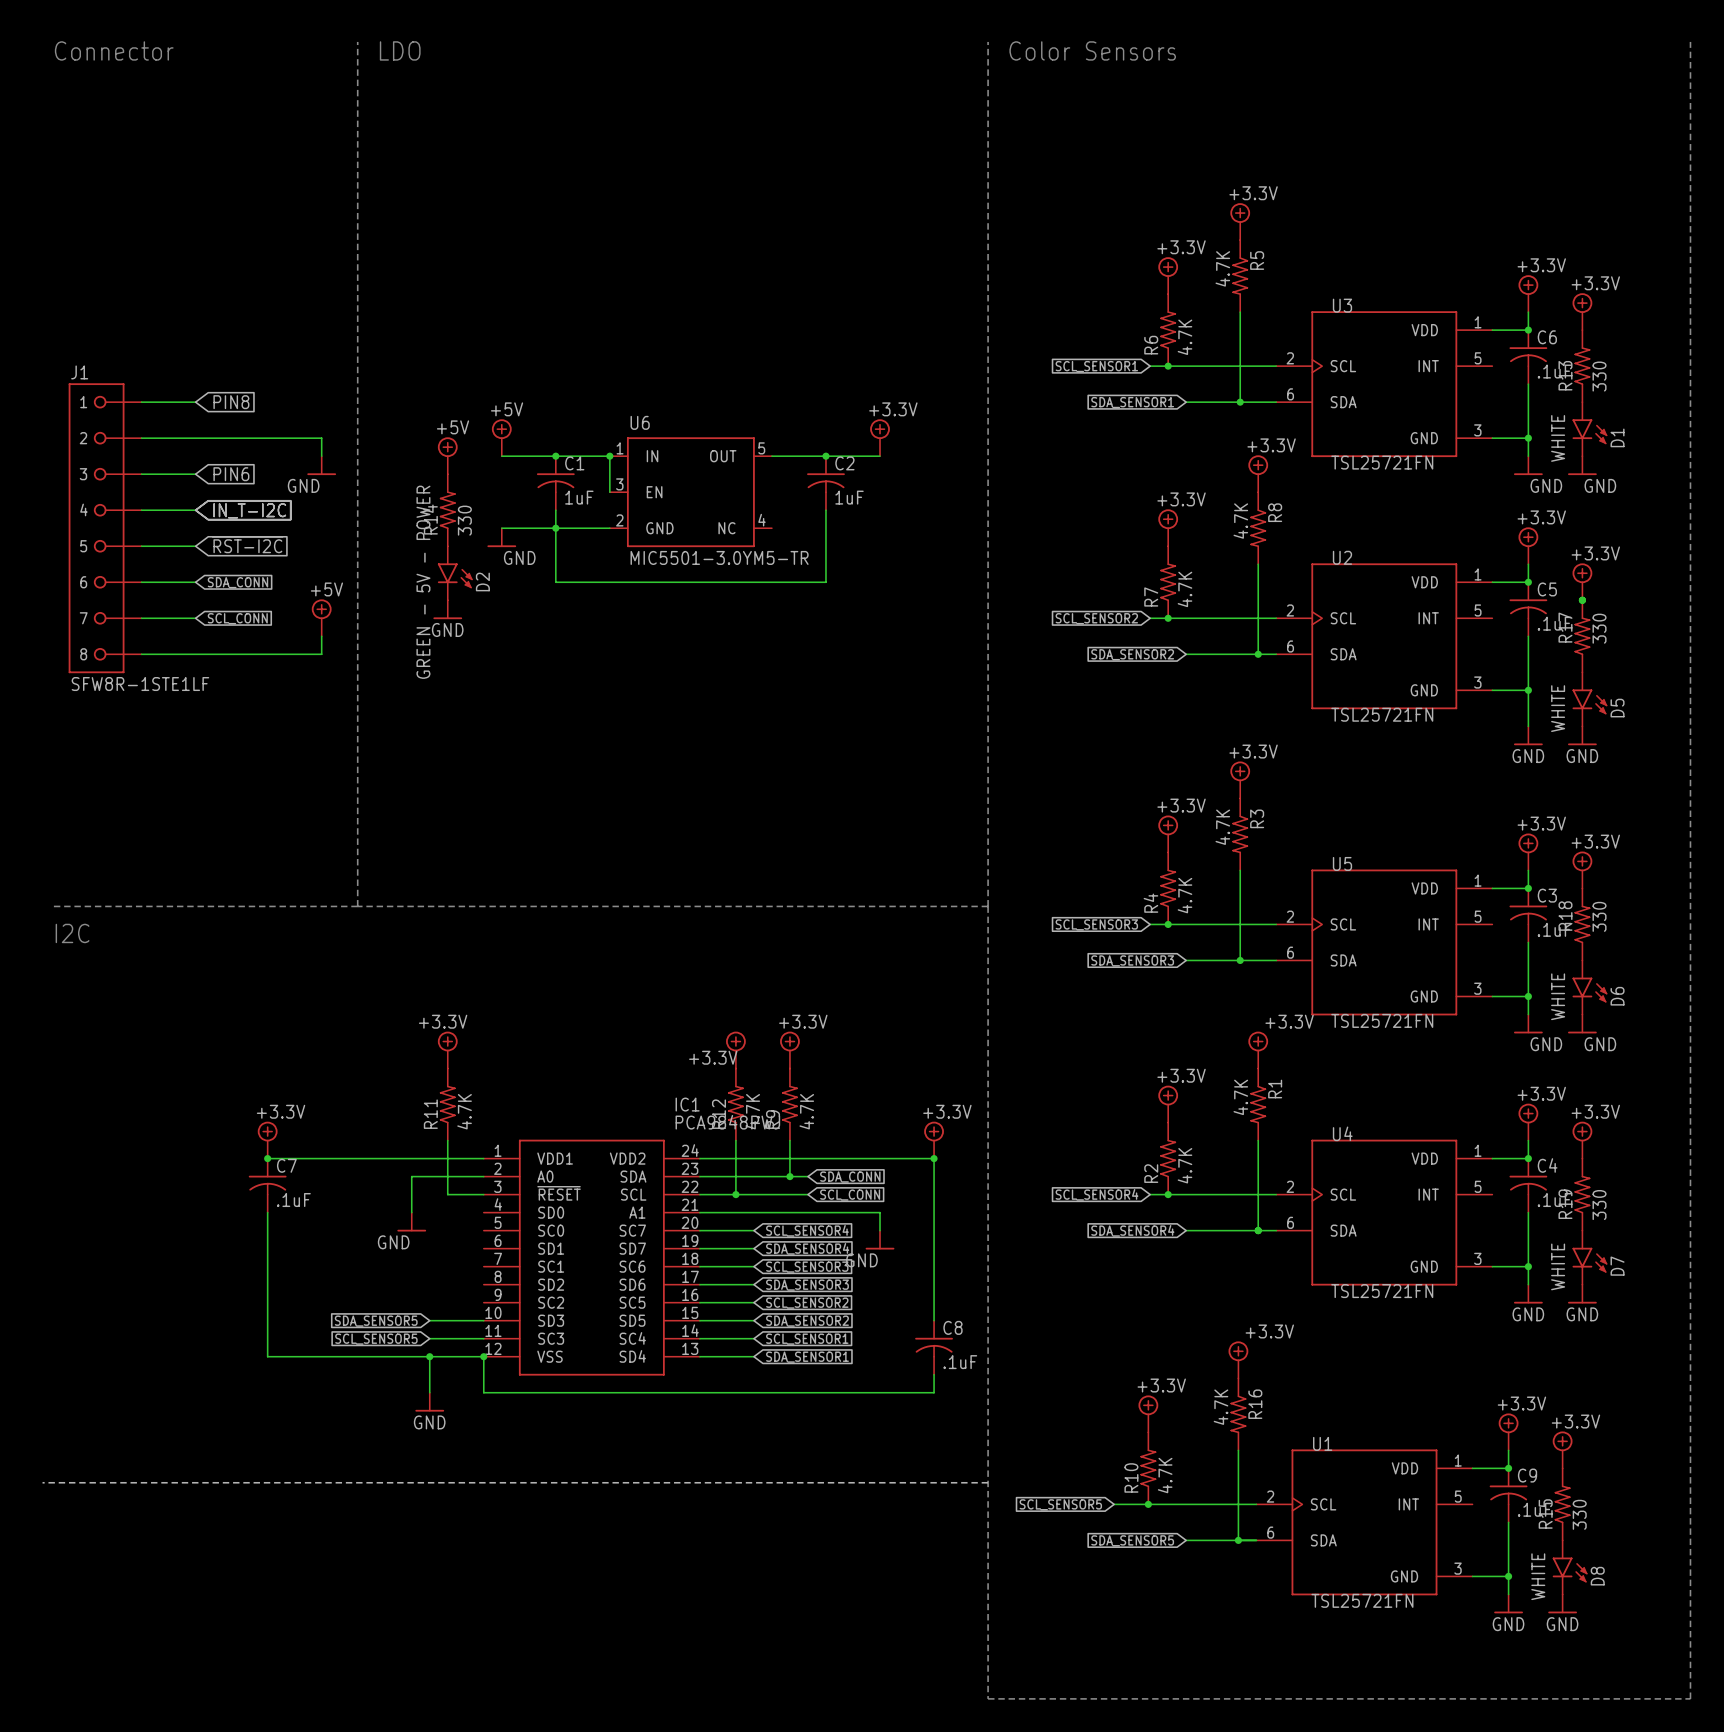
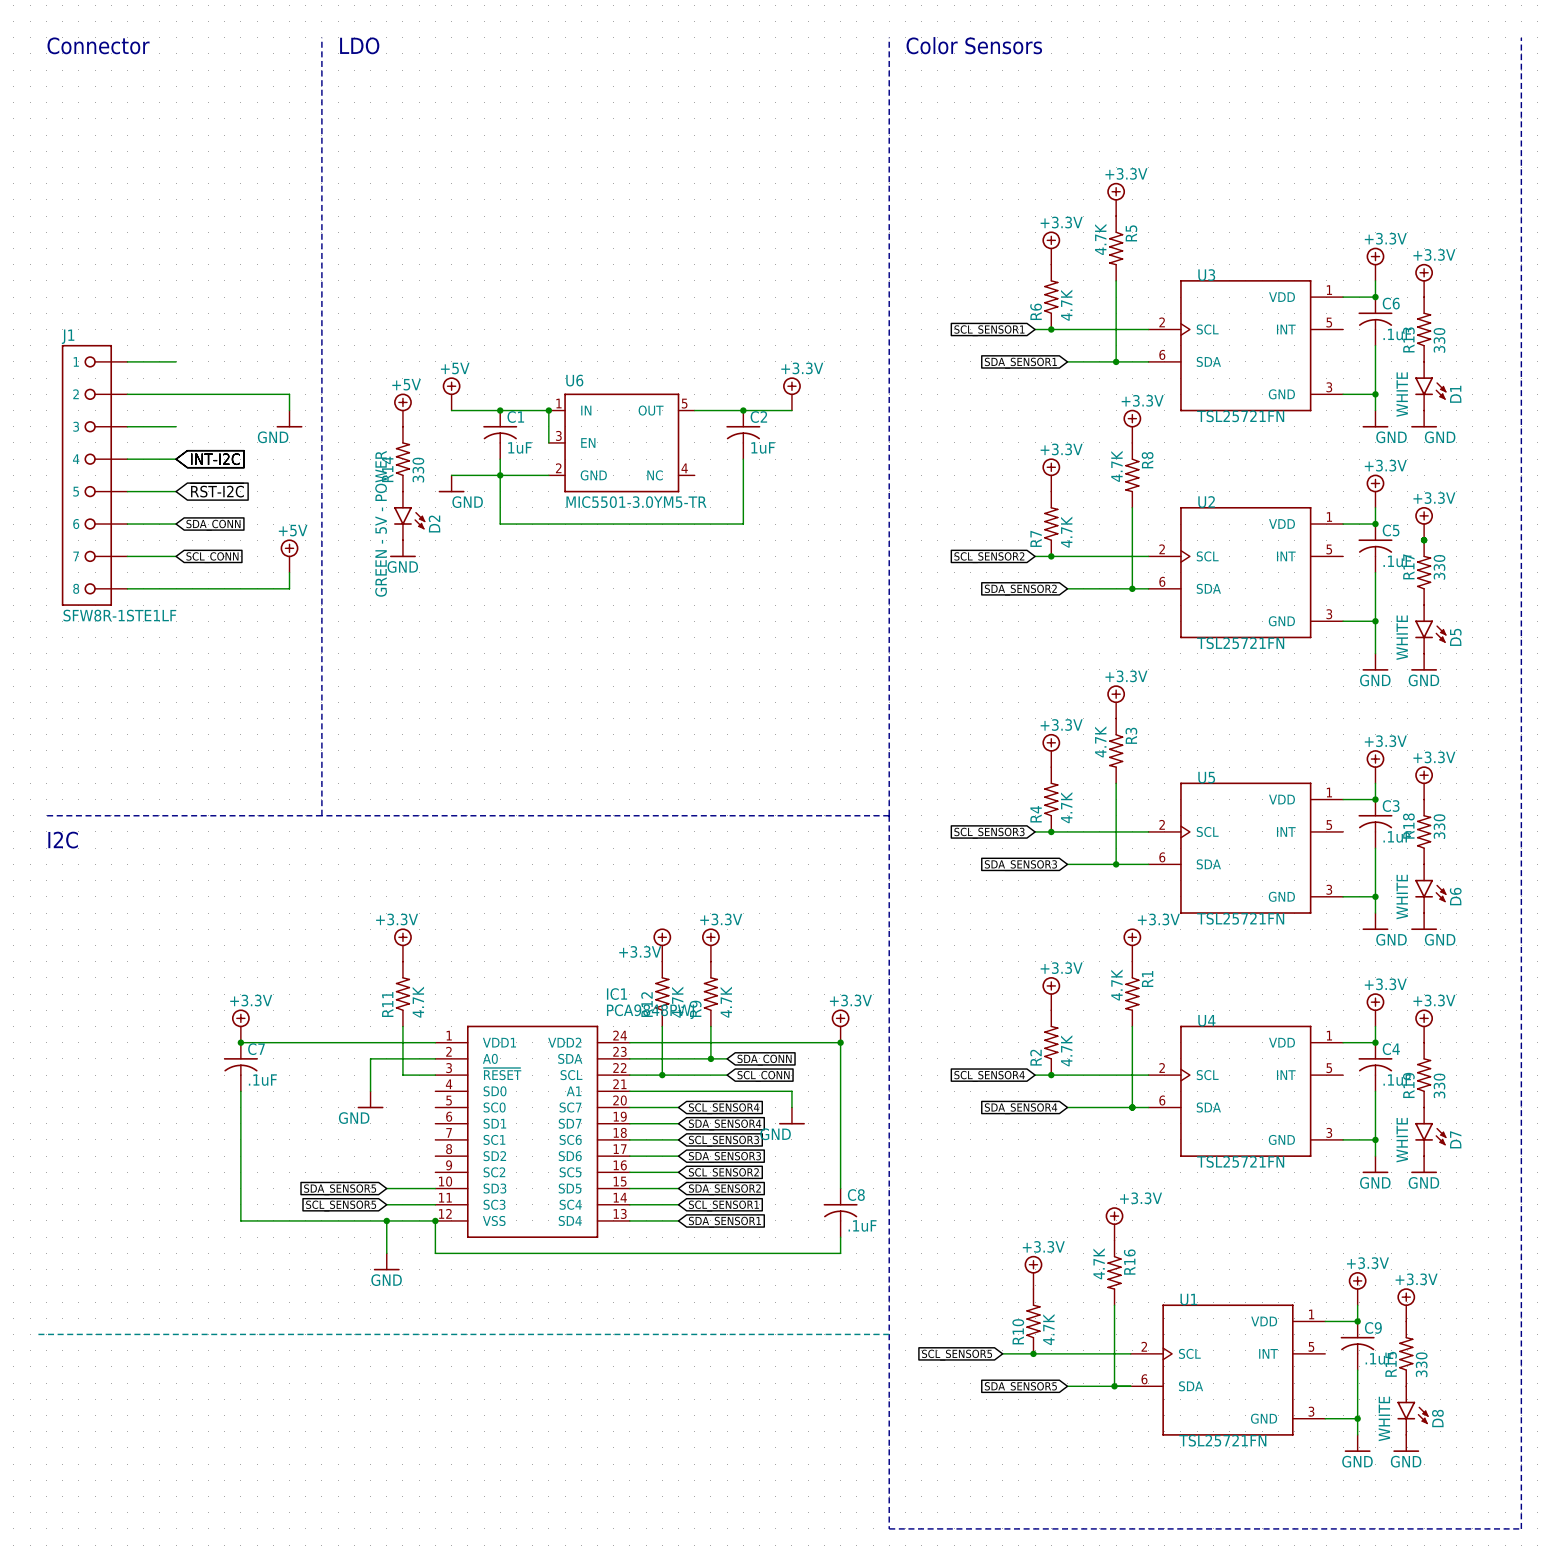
global label: PIN8 (231, 402) -> none
global label: PIN6 (231, 474) -> none
global label: IN_T-I2C (249, 510) -> INT-I2C (215, 459)

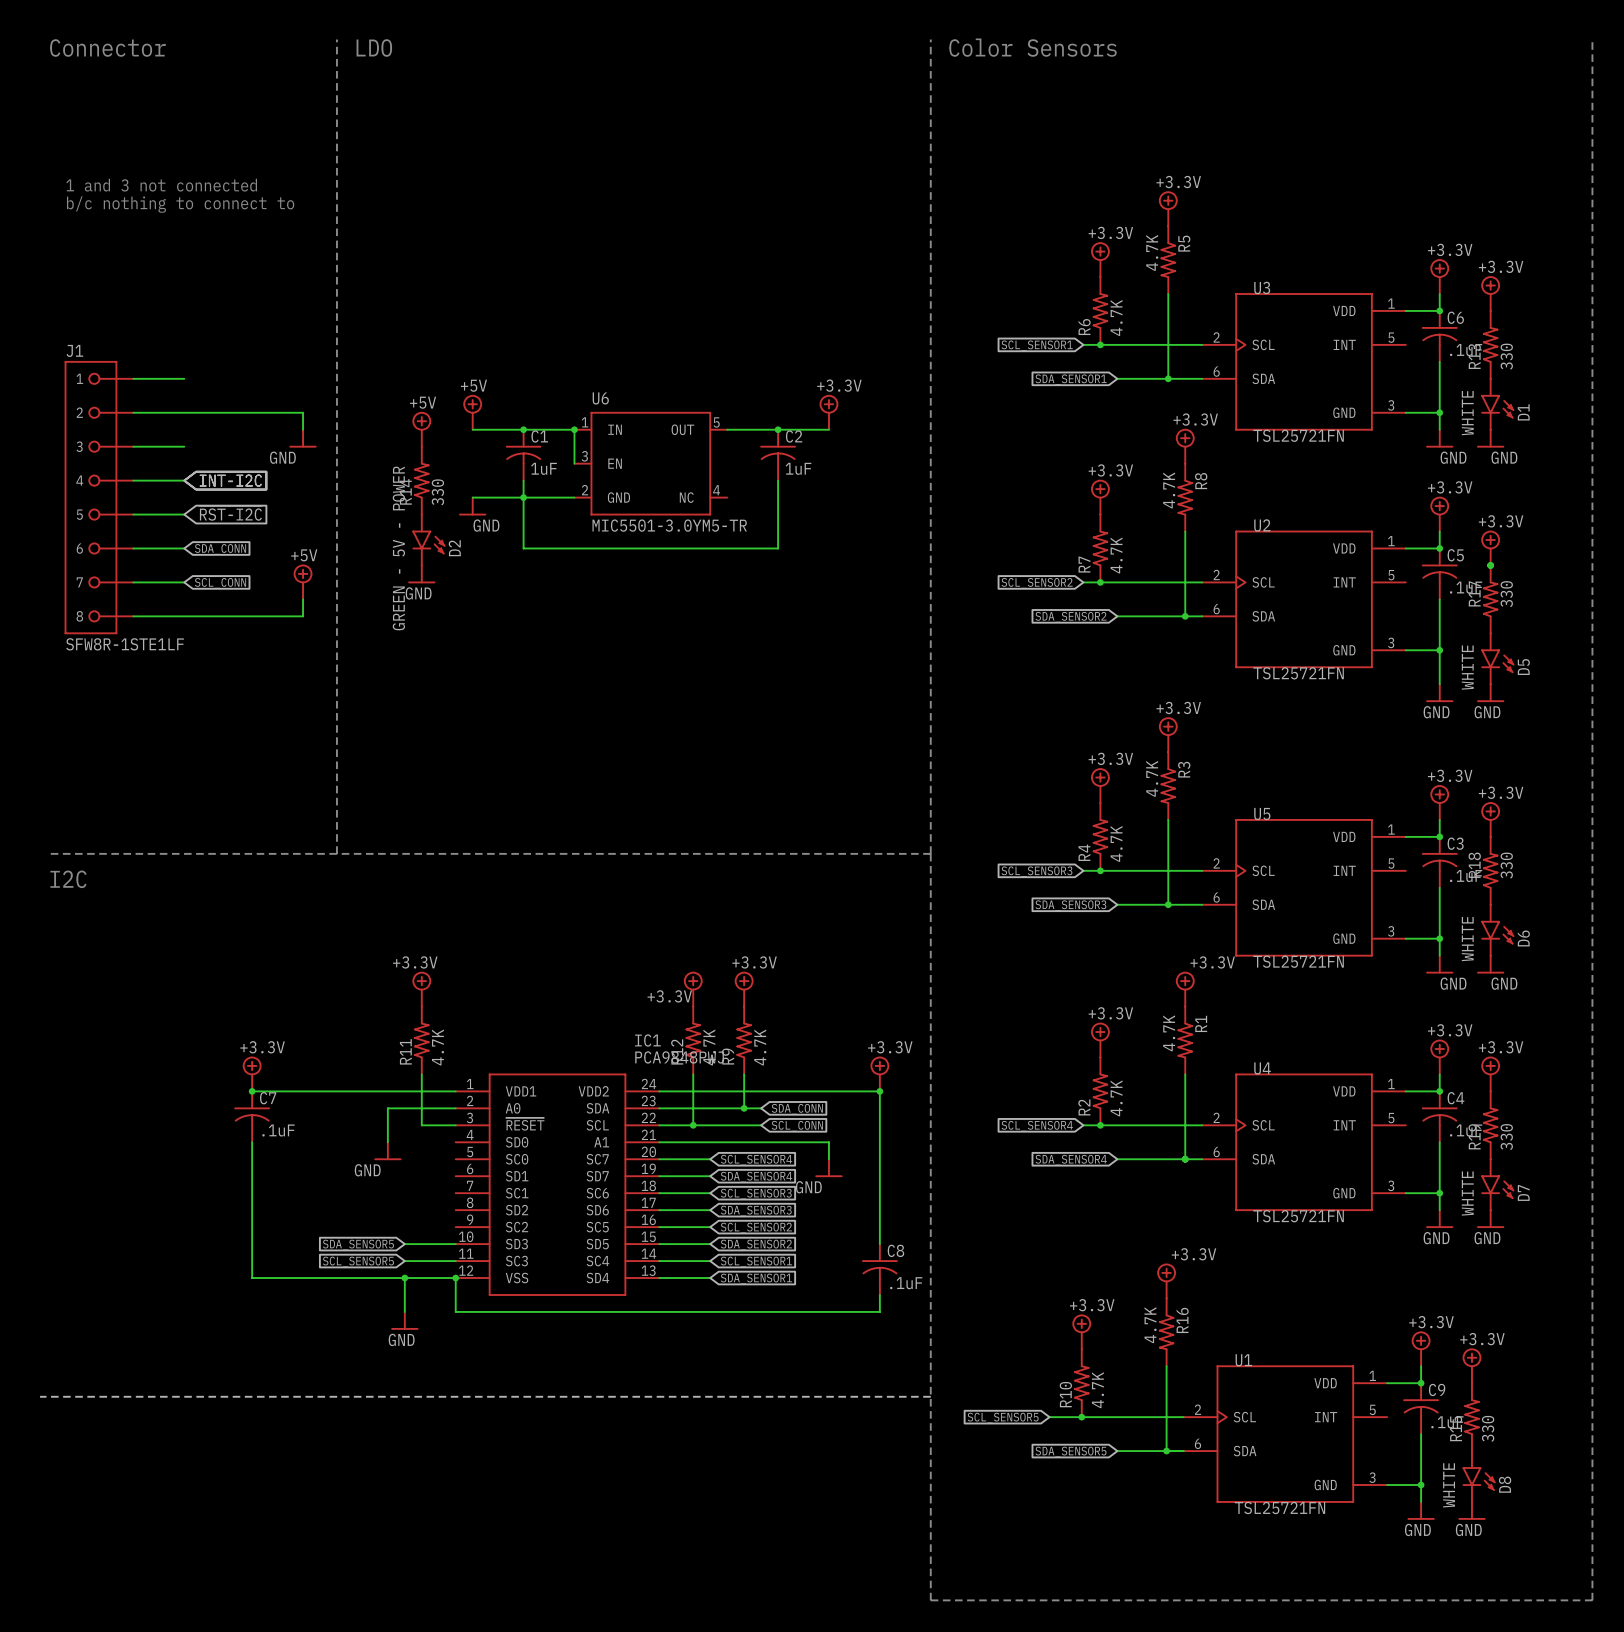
text: none -> 1 and 3 not connected (161, 185)
text: none -> b/c nothing to connect to (180, 204)

